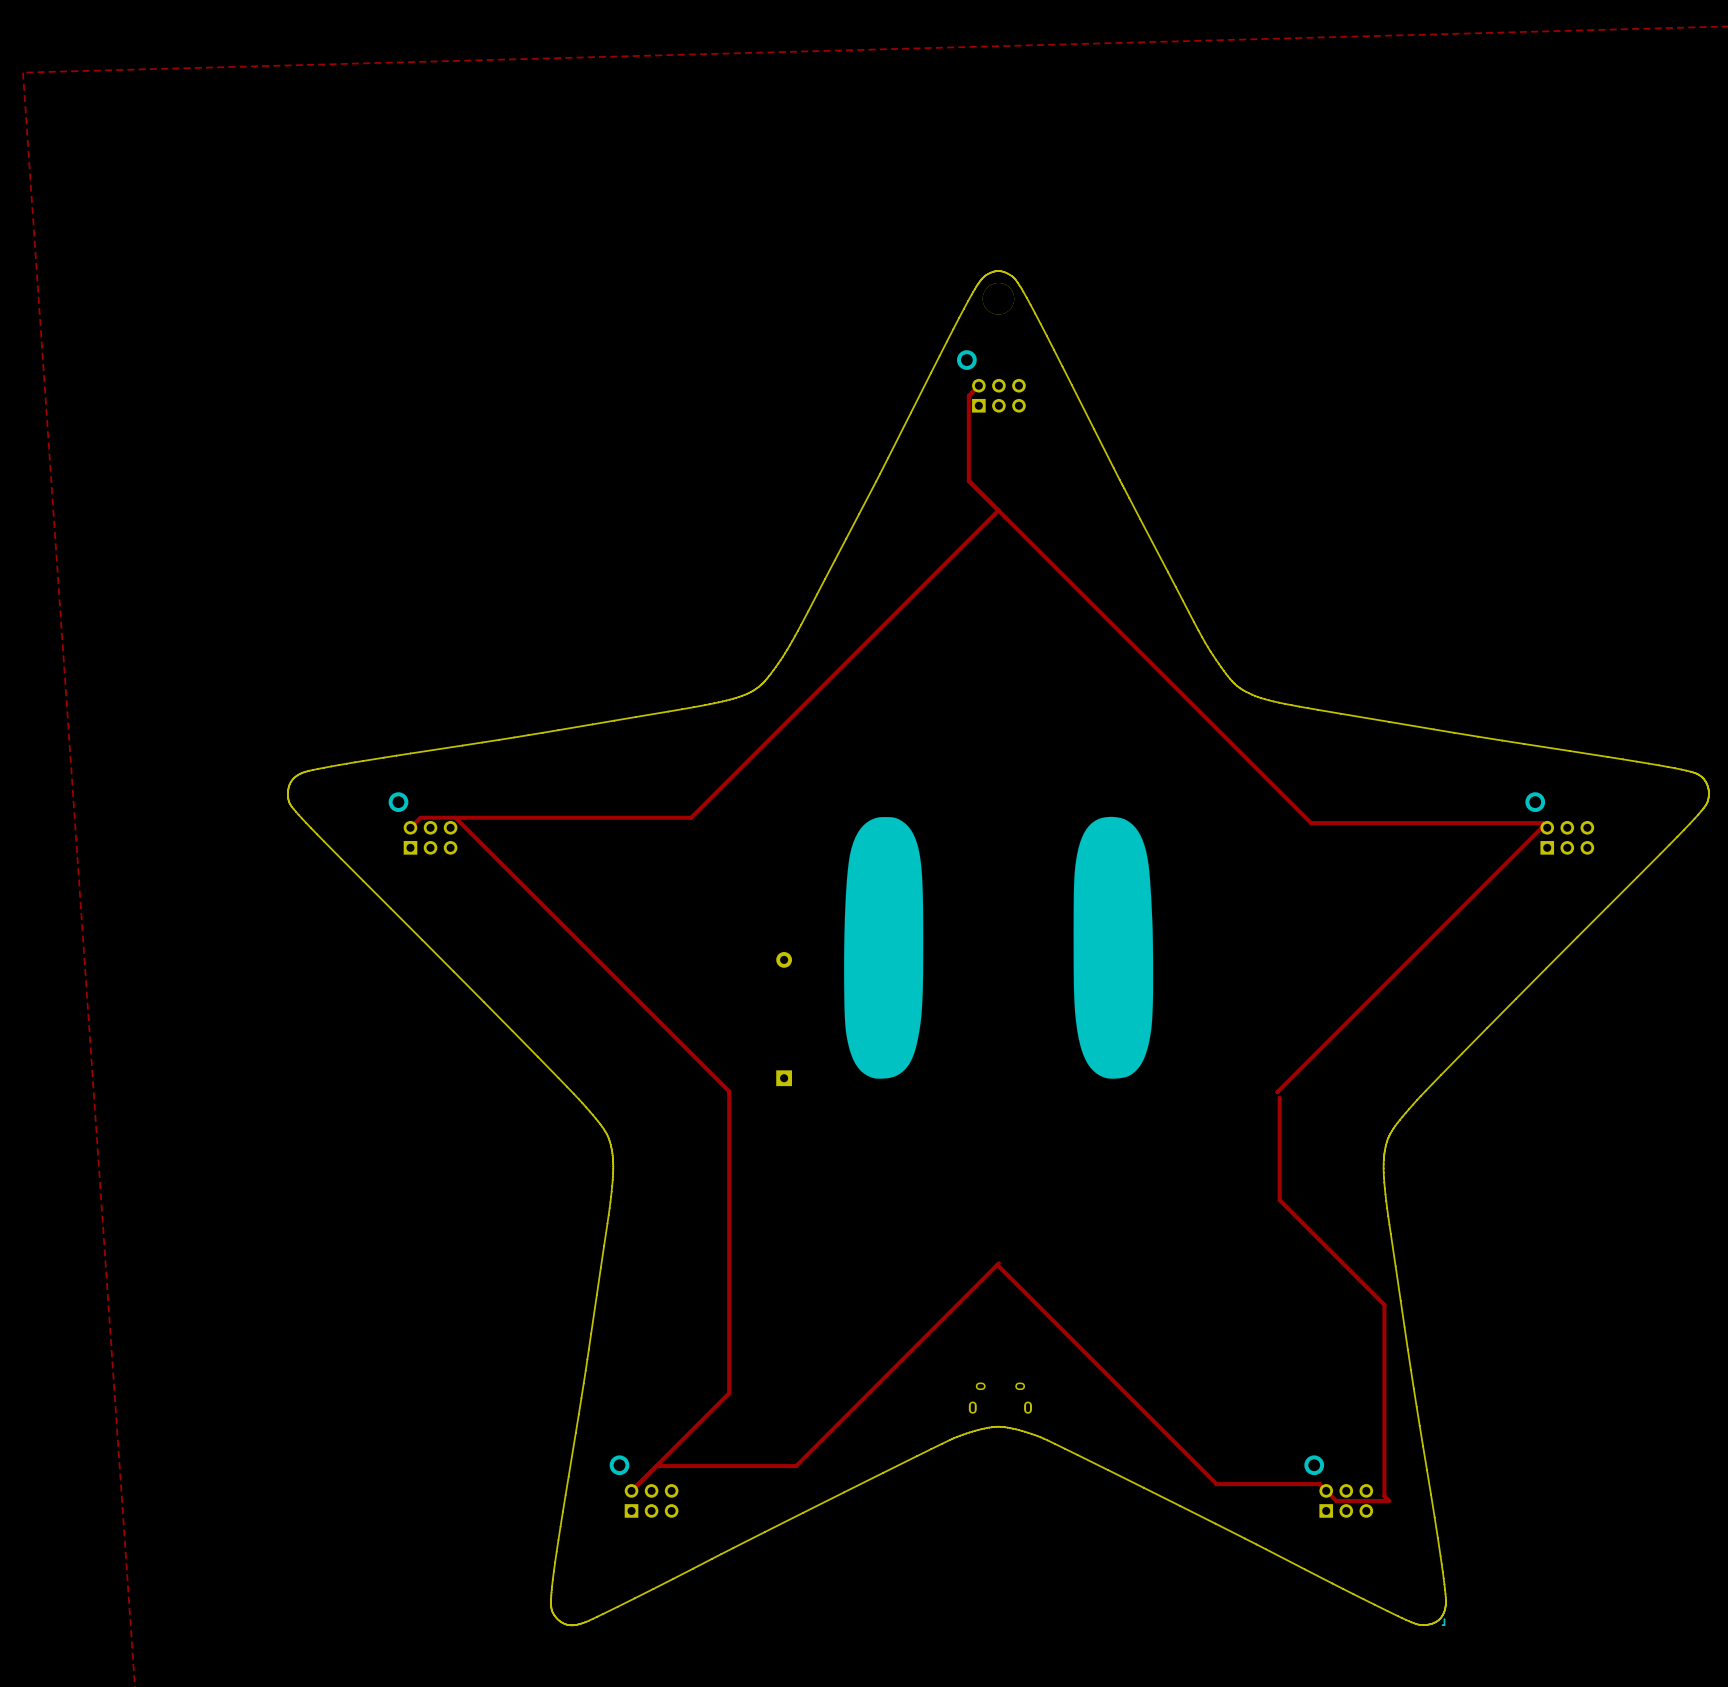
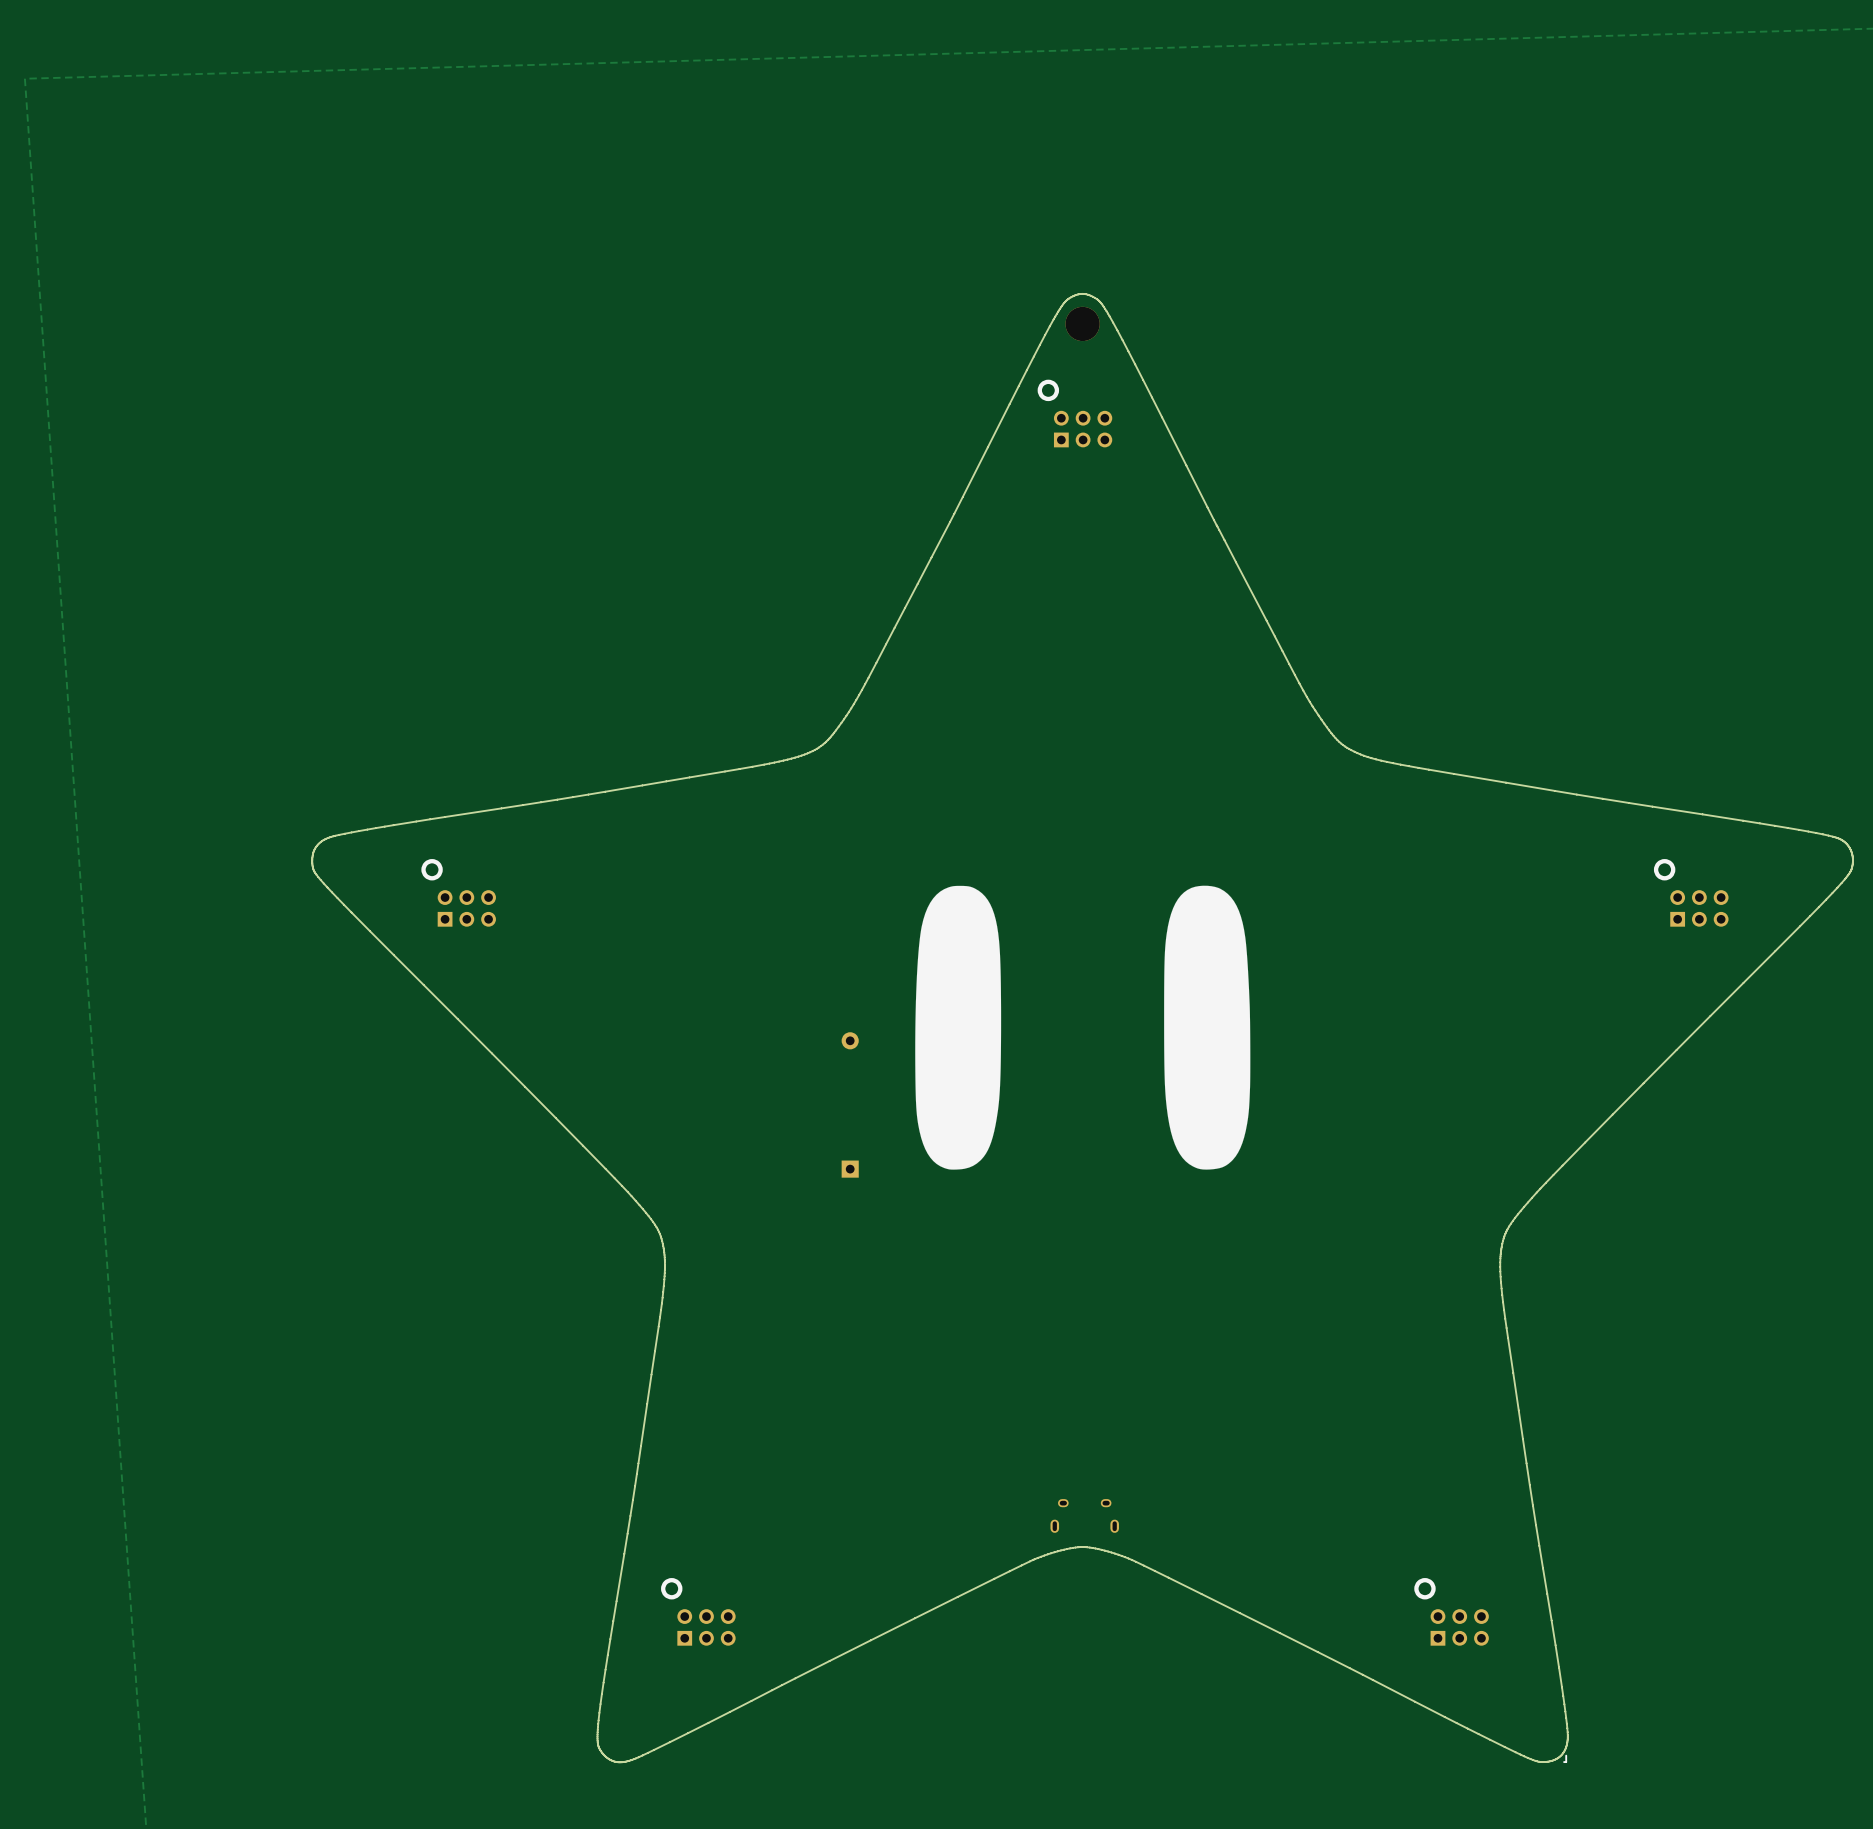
track: (978, 385) (968, 395) (968, 480) (1311, 823) -> none
track: (998, 510) (691, 817) (420, 817) (410, 827) -> none
track: (455, 817) (729, 1091) (729, 1393) (631, 1490) -> none
track: (1311, 823) (1542, 823) -> none
track: (1542, 823) (1542, 827) (1277, 1092) -> none
track: (1279, 1097) (1279, 1200) (1384, 1304) (1384, 1496) (1389, 1500) (1336, 1500) (1319, 1484) (1216, 1484) (997, 1264) -> none
track: (998, 1263) (796, 1466) (656, 1466) -> none

